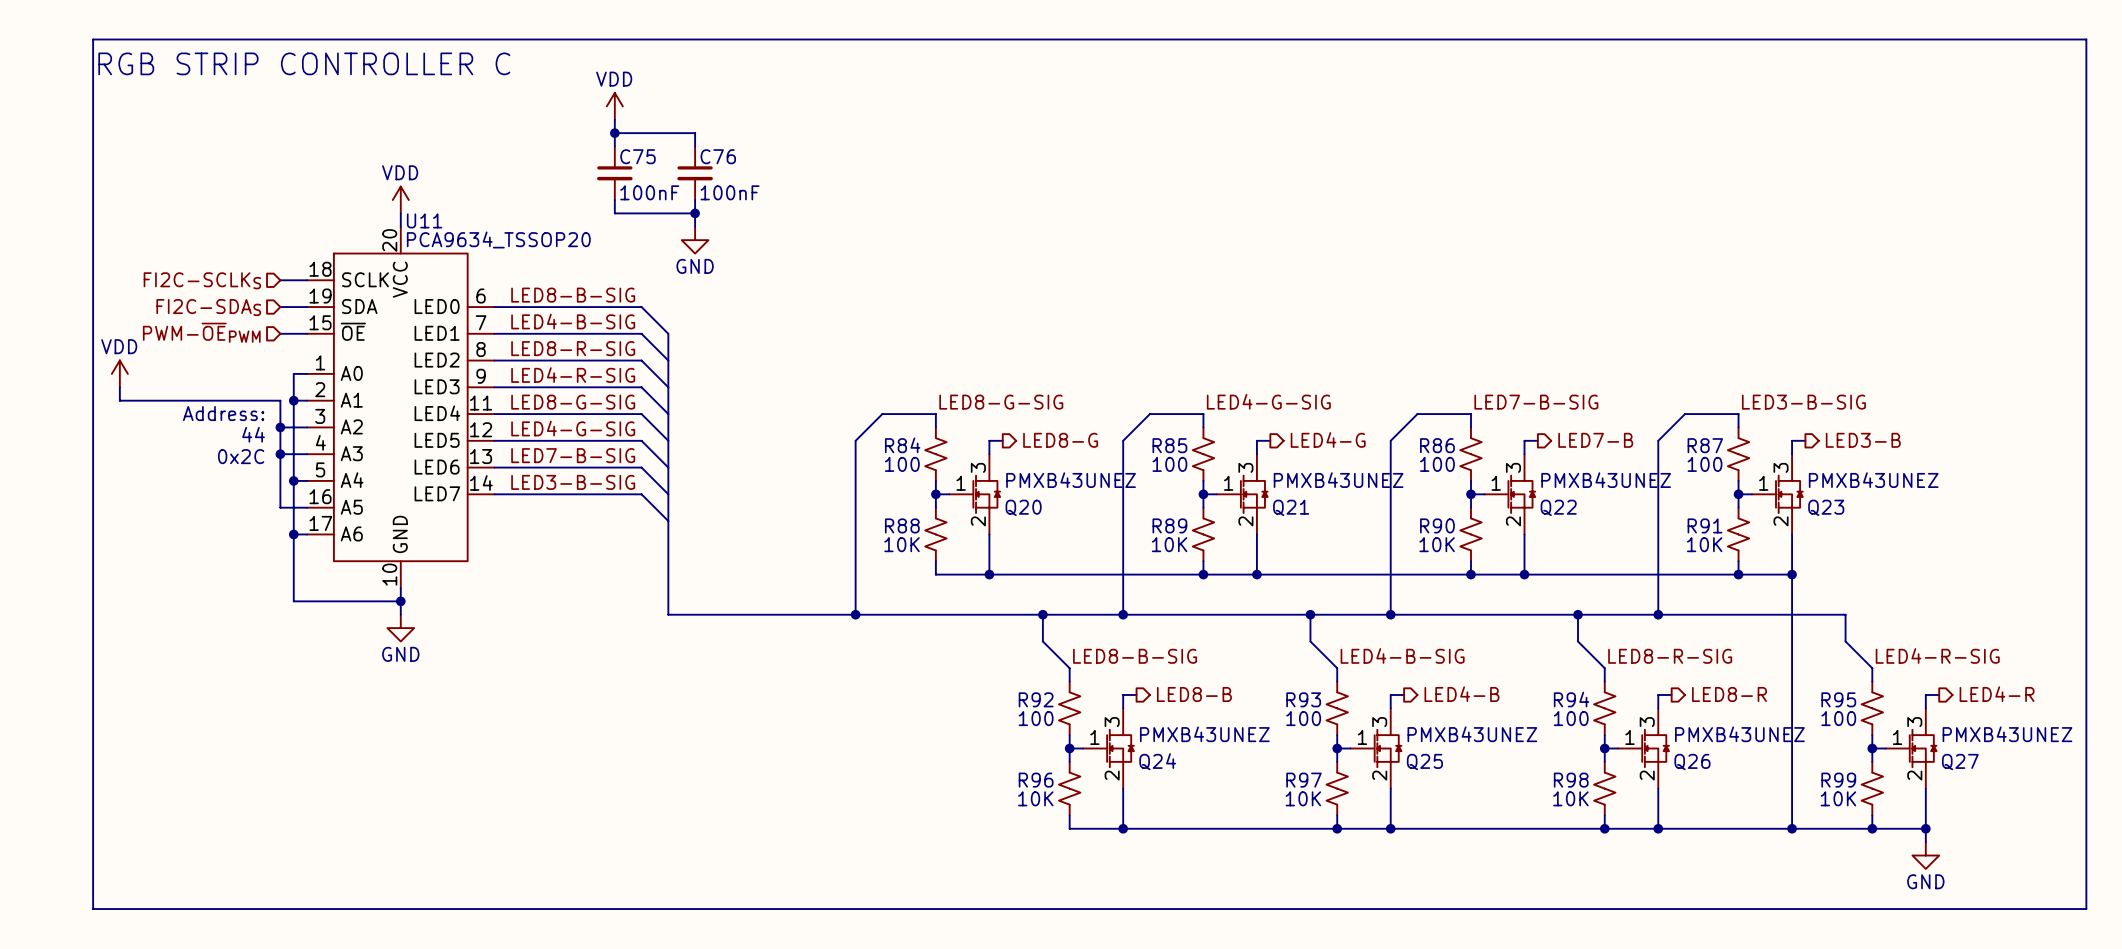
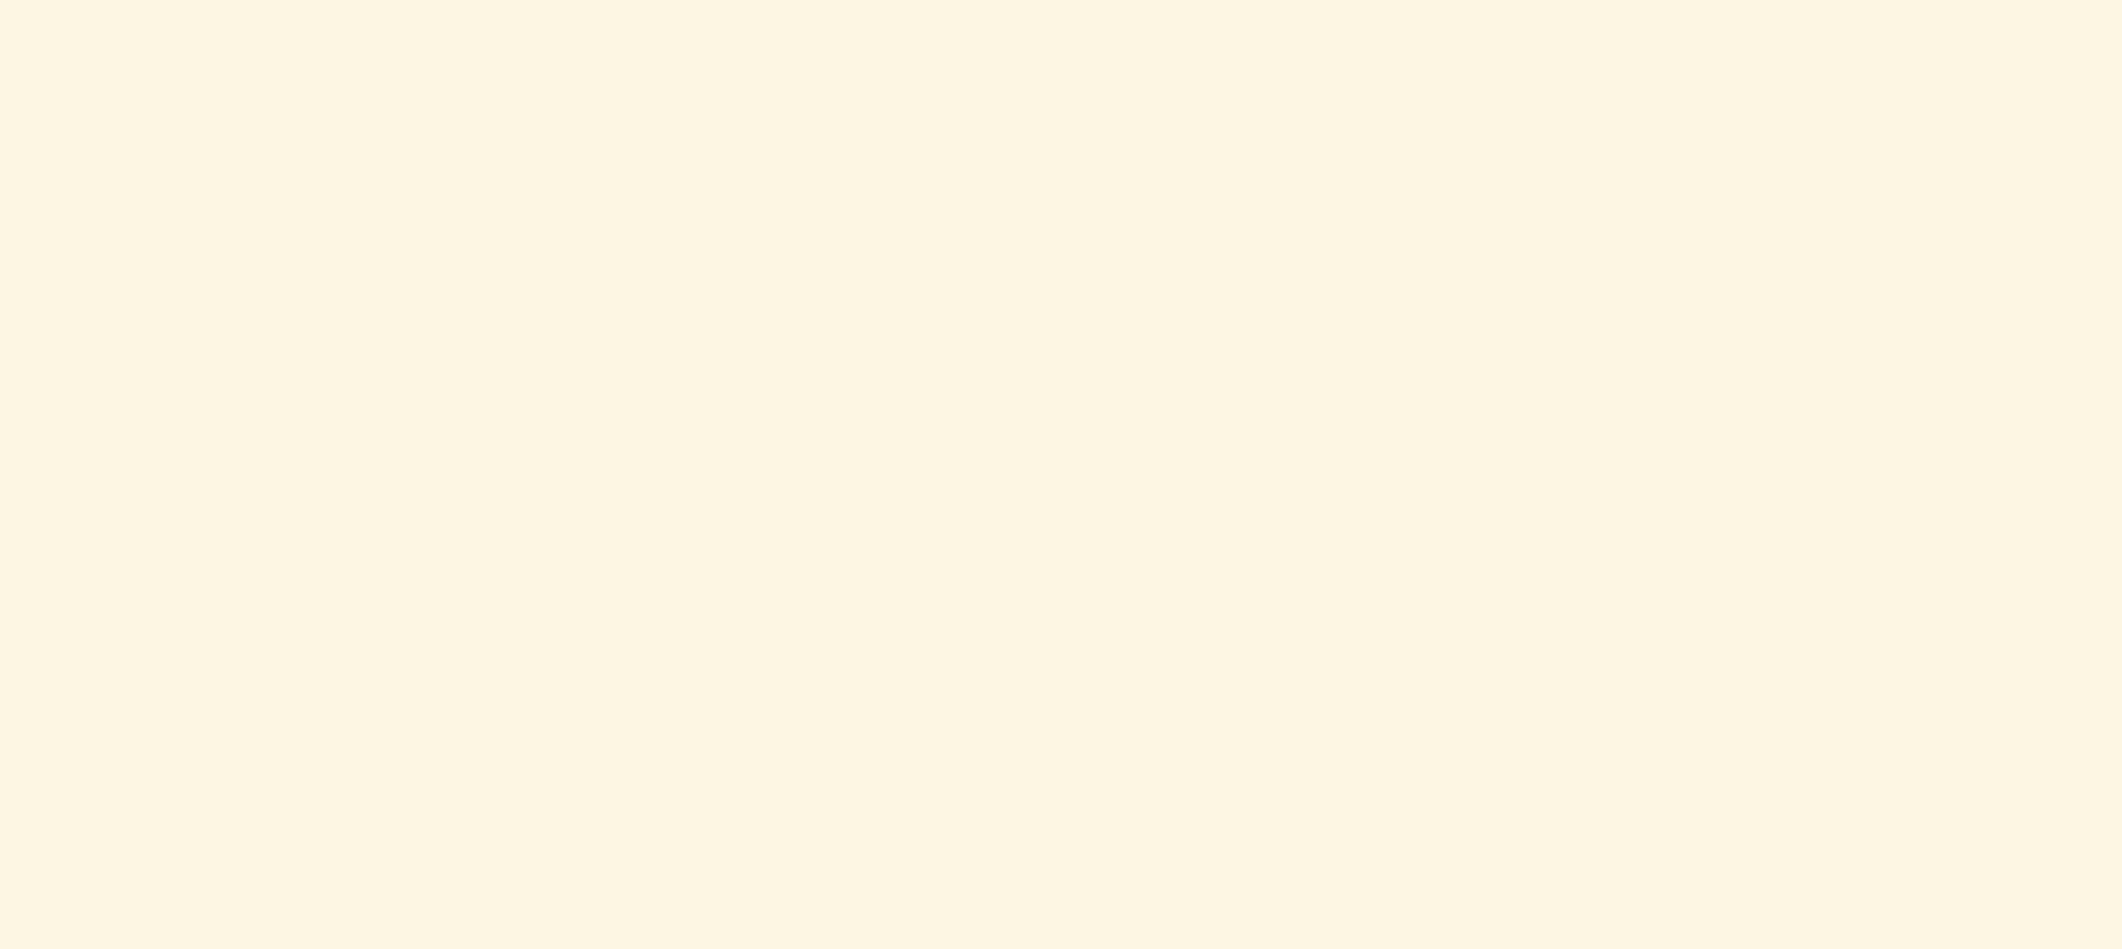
line: (93, 39) (93, 909) (2086, 909) (2086, 39) (93, 39) -> none
text: RGB STRIP CONTROLLER C (304, 63) -> none
power symbol: VDD (614, 106) -> none
wire: (614, 119) (614, 146) -> none
wire: (614, 133) (695, 133) (695, 146) -> none
junction: (614, 133) -> none
C75: 100nF (614, 173) -> none
C76: 100nF (695, 173) -> none
power symbol: VDD (400, 200) -> none
wire: (614, 200) (614, 213) (695, 213) -> none
wire: (695, 200) (695, 226) -> none
wire: (400, 213) (400, 226) -> none
junction: (695, 213) -> none
power symbol: GND (695, 240) -> none
hierarchical label: FI2C-SCLKS (202, 280) -> none
wire: (280, 280) (307, 280) -> none
label: LED8-B-SIG (573, 295) -> none
hierarchical label: FI2C-SDAS (208, 307) -> none
wire: (280, 307) (307, 307) -> none
wire: (494, 307) (641, 307) (668, 333) -> none
label: LED4-B-SIG (573, 321) -> none
hierarchical label: PWM-~{OE}PWM (201, 332) -> none
wire: (280, 333) (307, 333) -> none
wire: (494, 333) (641, 333) (668, 360) -> none
bus: (668, 333) (668, 614) (1845, 614) (1845, 641) -> none
label: LED8-R-SIG (573, 348) -> none
wire: (494, 360) (641, 360) (668, 387) -> none
power symbol: VDD (119, 373) -> none
wire: (307, 373) (293, 373) (293, 601) (400, 601) -> none
label: LED4-R-SIG (573, 375) -> none
wire: (119, 387) (119, 400) (280, 400) (280, 507) (307, 507) -> none
wire: (494, 387) (641, 387) (668, 414) -> none
wire: (293, 400) (307, 400) -> none
junction: (293, 400) -> none
label: LED4-G-SIG (1268, 401) -> none
label: LED8-G-SIG (573, 402) -> none
label: LED8-G-SIG (1001, 402) -> none
label: LED7-B-SIG (1536, 402) -> none
label: LED3-B-SIG (1803, 402) -> none
U11: PCA9634_TSSOP20 (400, 407) -> none
text: Address: (223, 413) -> none
wire: (494, 414) (641, 414) (668, 440) -> none
wire: (280, 427) (307, 427) -> none
junction: (280, 427) -> none
wire: (935, 427) (935, 414) (882, 414) (855, 440) -> none
wire: (1203, 427) (1203, 414) (1149, 414) (1123, 440) -> none
wire: (1470, 427) (1470, 414) (1417, 414) (1390, 440) -> none
wire: (1738, 427) (1738, 414) (1685, 414) (1658, 440) -> none
label: LED4-G-SIG (573, 428) -> none
text: 44 (253, 434) -> none
wire: (494, 440) (641, 440) (668, 467) -> none
bus: (855, 440) (855, 614) -> none
wire: (1002, 440) (989, 440) (989, 454) -> none
hierarchical label: LED8-G (1060, 440) -> none
bus: (1123, 440) (1123, 614) -> none
wire: (1270, 440) (1256, 440) (1256, 454) -> none
hierarchical label: LED4-G (1328, 440) -> none
bus: (1390, 440) (1390, 614) -> none
wire: (1537, 440) (1524, 440) (1524, 454) -> none
hierarchical label: LED7-B (1595, 440) -> none
bus: (1658, 440) (1658, 614) -> none
wire: (1805, 440) (1792, 440) (1792, 454) -> none
hierarchical label: LED3-B (1863, 440) -> none
wire: (280, 454) (307, 454) -> none
junction: (280, 454) -> none
R84: 100 (935, 454) -> none
R85: 100 (1203, 454) -> none
R86: 100 (1470, 454) -> none
R87: 100 (1738, 454) -> none
label: LED7-B-SIG (573, 455) -> none
text: 0x2C (241, 456) -> none
wire: (494, 467) (641, 467) (668, 494) -> none
wire: (293, 480) (307, 480) -> none
junction: (293, 480) -> none
wire: (935, 480) (935, 507) -> none
wire: (1203, 480) (1203, 507) -> none
wire: (1470, 480) (1470, 507) -> none
wire: (1738, 480) (1738, 507) -> none
label: LED3-B-SIG (573, 482) -> none
wire: (494, 494) (641, 494) (668, 521) -> none
wire: (935, 494) (949, 494) -> none
junction: (935, 494) -> none
Q20: PMXB43UNEZ (974, 494) -> none
wire: (1203, 494) (1216, 494) -> none
junction: (1203, 494) -> none
Q21: PMXB43UNEZ (1242, 494) -> none
wire: (1470, 494) (1484, 494) -> none
junction: (1470, 494) -> none
Q22: PMXB43UNEZ (1509, 494) -> none
wire: (1738, 494) (1751, 494) -> none
junction: (1738, 494) -> none
Q23: PMXB43UNEZ (1777, 494) -> none
wire: (293, 534) (307, 534) -> none
junction: (293, 534) -> none
R88: 10K (935, 534) -> none
wire: (989, 534) (989, 574) -> none
R89: 10K (1203, 534) -> none
wire: (1256, 534) (1256, 574) -> none
R90: 10K (1470, 534) -> none
wire: (1524, 534) (1524, 574) -> none
R91: 10K (1738, 534) -> none
wire: (1792, 534) (1792, 828) -> none
wire: (935, 561) (935, 574) (1792, 574) -> none
wire: (1203, 561) (1203, 574) -> none
wire: (1470, 561) (1470, 574) -> none
wire: (1738, 561) (1738, 574) -> none
junction: (989, 574) -> none
junction: (1203, 574) -> none
junction: (1256, 574) -> none
junction: (1470, 574) -> none
junction: (1524, 574) -> none
junction: (1738, 574) -> none
junction: (1792, 574) -> none
wire: (400, 587) (400, 614) -> none
junction: (400, 601) -> none
junction: (855, 614) -> none
bus: (1042, 614) (1042, 641) -> none
junction: (1042, 614) -> none
junction: (1123, 614) -> none
bus: (1310, 614) (1310, 641) -> none
junction: (1310, 614) -> none
junction: (1390, 614) -> none
bus: (1578, 614) (1578, 641) -> none
junction: (1578, 614) -> none
junction: (1658, 614) -> none
power symbol: GND (400, 628) -> none
wire: (1042, 641) (1069, 668) (1069, 681) -> none
wire: (1310, 641) (1337, 668) (1337, 681) -> none
wire: (1578, 641) (1604, 668) (1604, 681) -> none
wire: (1845, 641) (1872, 668) (1872, 681) -> none
label: LED4-B-SIG (1402, 655) -> none
label: LED4-R-SIG (1937, 655) -> none
label: LED8-B-SIG (1135, 656) -> none
label: LED8-R-SIG (1670, 656) -> none
wire: (1136, 694) (1123, 694) (1123, 708) -> none
hierarchical label: LED8-B (1194, 694) -> none
wire: (1404, 694) (1390, 694) (1390, 708) -> none
hierarchical label: LED4-B (1461, 694) -> none
wire: (1671, 694) (1658, 694) (1658, 708) -> none
hierarchical label: LED8-R (1729, 694) -> none
wire: (1939, 694) (1925, 694) (1925, 708) -> none
hierarchical label: LED4-R (1997, 694) -> none
R92: 100 (1069, 708) -> none
R93: 100 (1337, 708) -> none
R94: 100 (1604, 708) -> none
R95: 100 (1872, 708) -> none
wire: (1069, 735) (1069, 761) -> none
wire: (1337, 735) (1337, 761) -> none
wire: (1604, 735) (1604, 761) -> none
wire: (1872, 735) (1872, 761) -> none
wire: (1069, 748) (1083, 748) -> none
junction: (1069, 748) -> none
Q24: PMXB43UNEZ (1108, 748) -> none
wire: (1337, 748) (1350, 748) -> none
junction: (1337, 748) -> none
Q25: PMXB43UNEZ (1376, 748) -> none
wire: (1604, 748) (1618, 748) -> none
junction: (1604, 748) -> none
Q26: PMXB43UNEZ (1643, 748) -> none
wire: (1872, 748) (1885, 748) -> none
junction: (1872, 748) -> none
Q27: PMXB43UNEZ (1911, 748) -> none
R96: 10K (1069, 788) -> none
wire: (1123, 788) (1123, 828) -> none
R97: 10K (1337, 788) -> none
wire: (1390, 788) (1390, 828) -> none
R98: 10K (1604, 788) -> none
wire: (1658, 788) (1658, 828) -> none
R99: 10K (1872, 788) -> none
wire: (1925, 788) (1925, 842) -> none
wire: (1069, 815) (1069, 828) (1925, 828) -> none
wire: (1337, 815) (1337, 828) -> none
wire: (1604, 815) (1604, 828) -> none
wire: (1872, 815) (1872, 828) -> none
junction: (1123, 828) -> none
junction: (1337, 828) -> none
junction: (1390, 828) -> none
junction: (1604, 828) -> none
junction: (1658, 828) -> none
junction: (1792, 828) -> none
junction: (1872, 828) -> none
junction: (1925, 828) -> none
power symbol: GND (1925, 855) -> none

